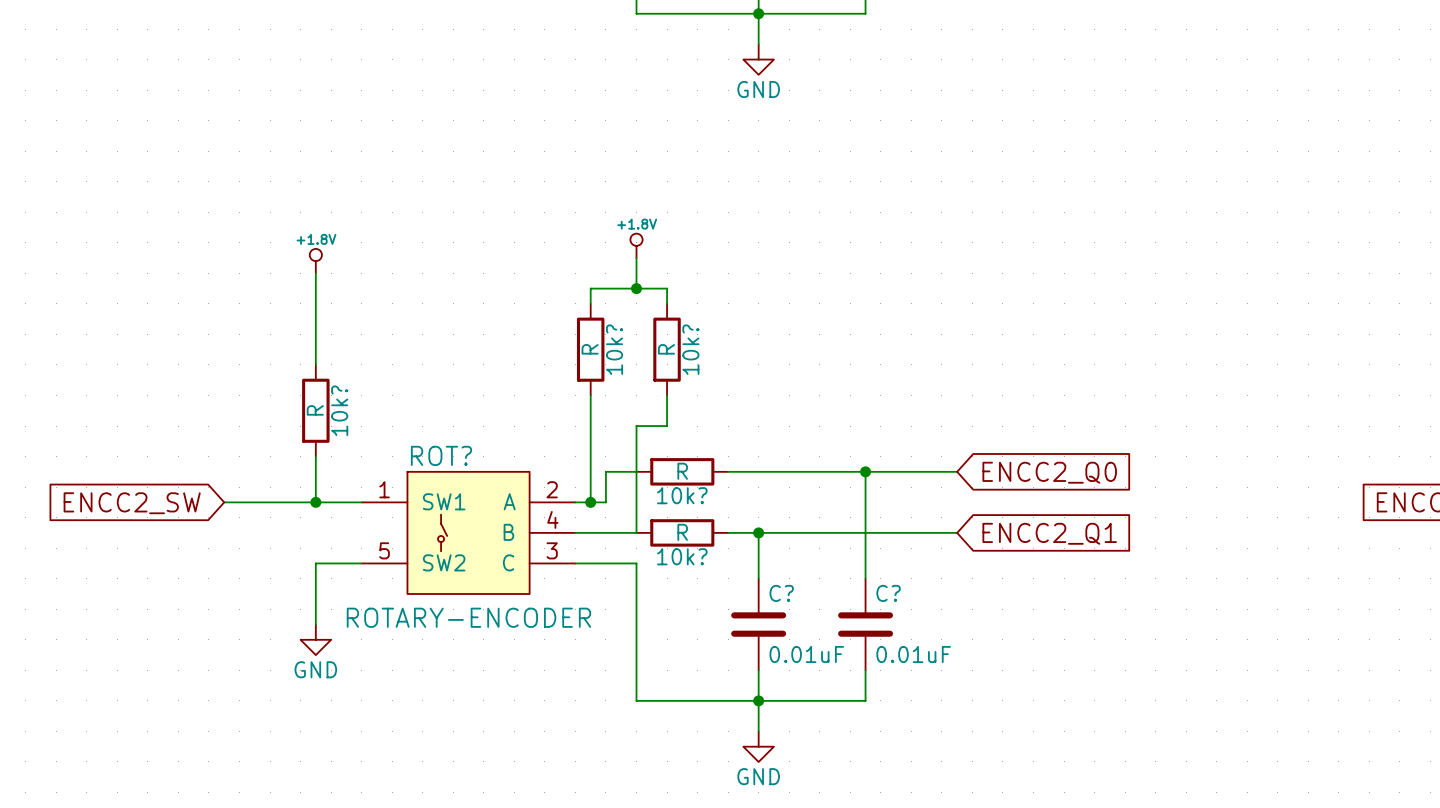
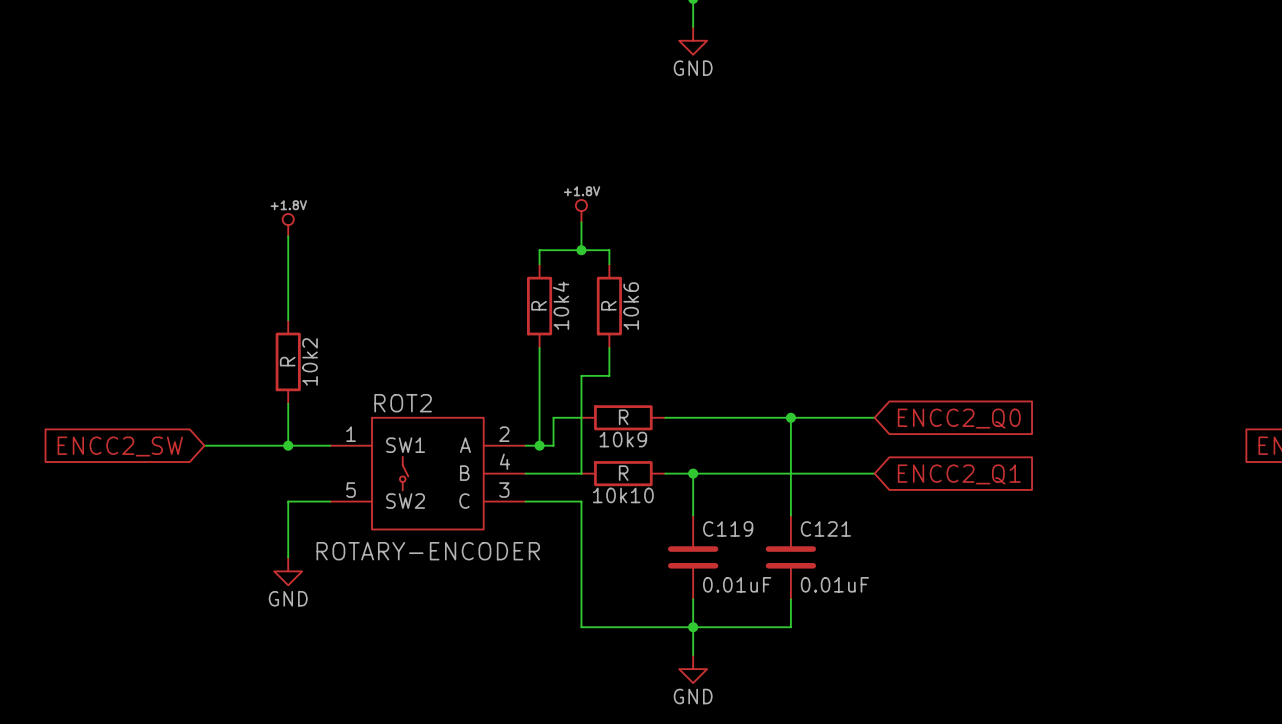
10k? name: 10k? (614, 349) -> 10k4 (561, 305)
10k? name: 10k? (690, 349) -> 10k6 (631, 306)
10k? name: 10k? (339, 410) -> 10k2 (310, 361)
ROT? name: ROT? (441, 455) -> ROT2 (403, 403)
10k? name: 10k? (682, 495) -> 10k9 (623, 439)
10k? name: 10k? (682, 556) -> 10k10 (623, 495)
C? name: C? (781, 593) -> C119 (728, 528)
C? name: C? (888, 593) -> C121 (825, 528)

